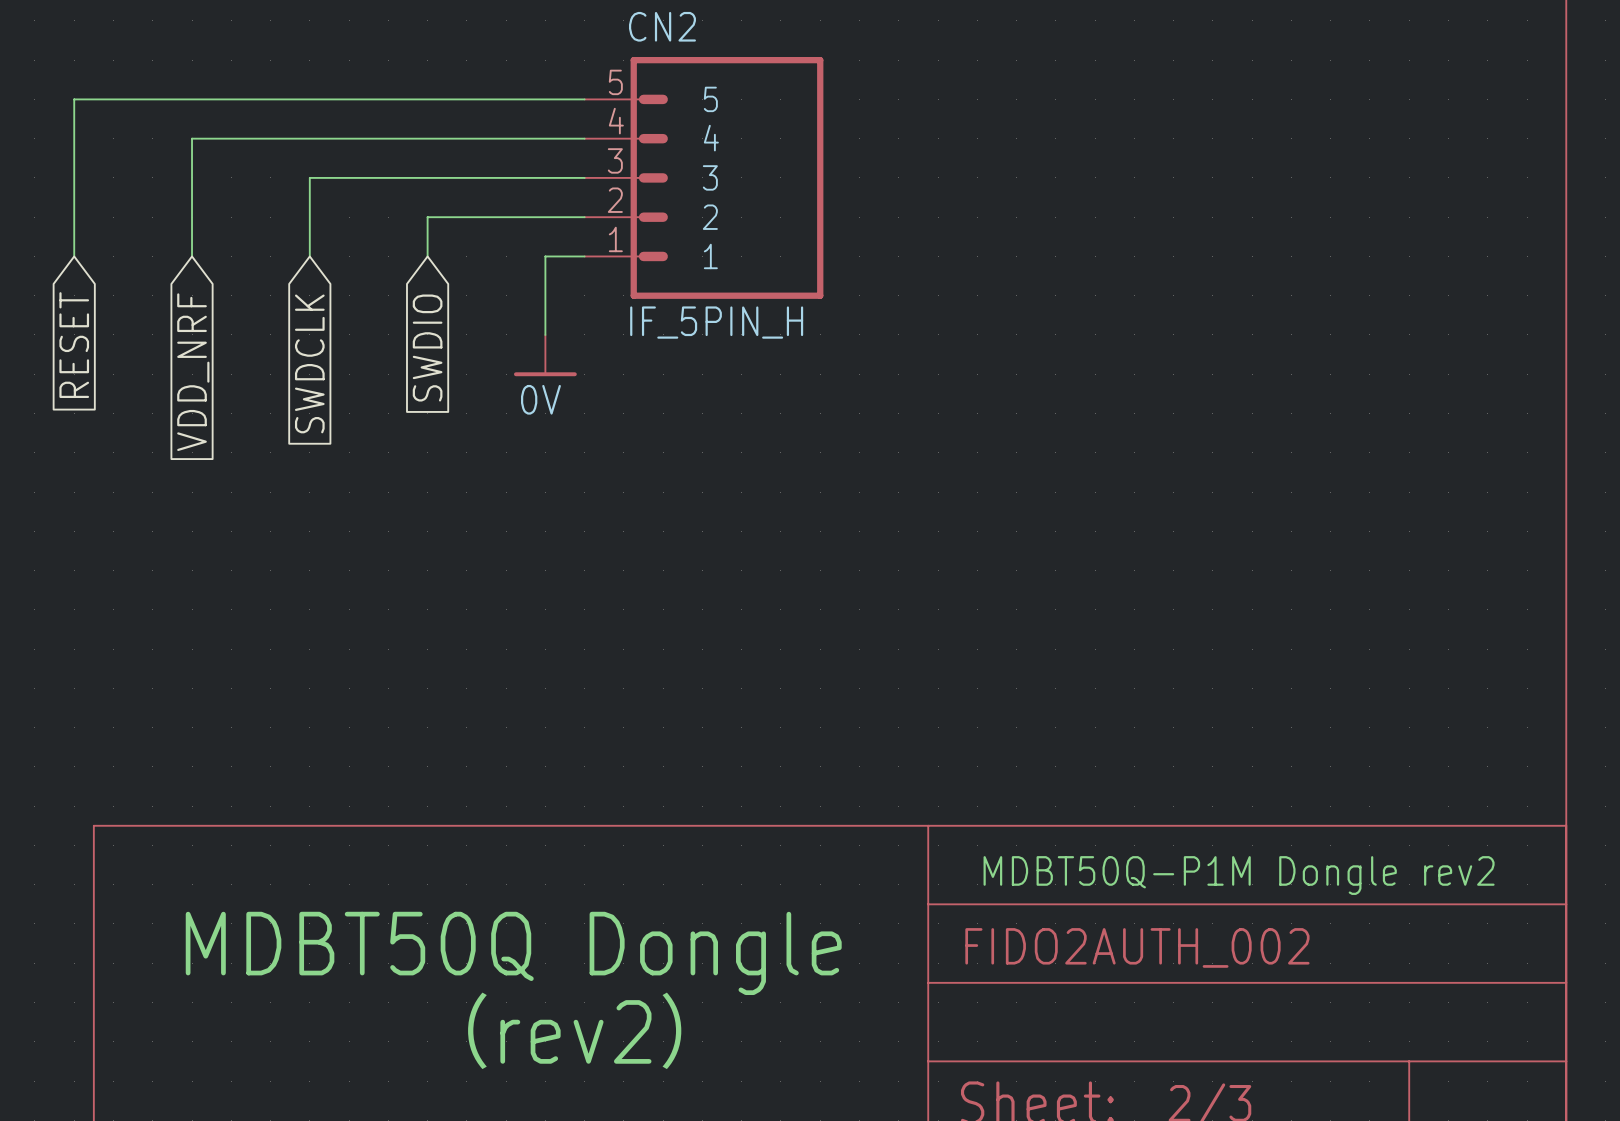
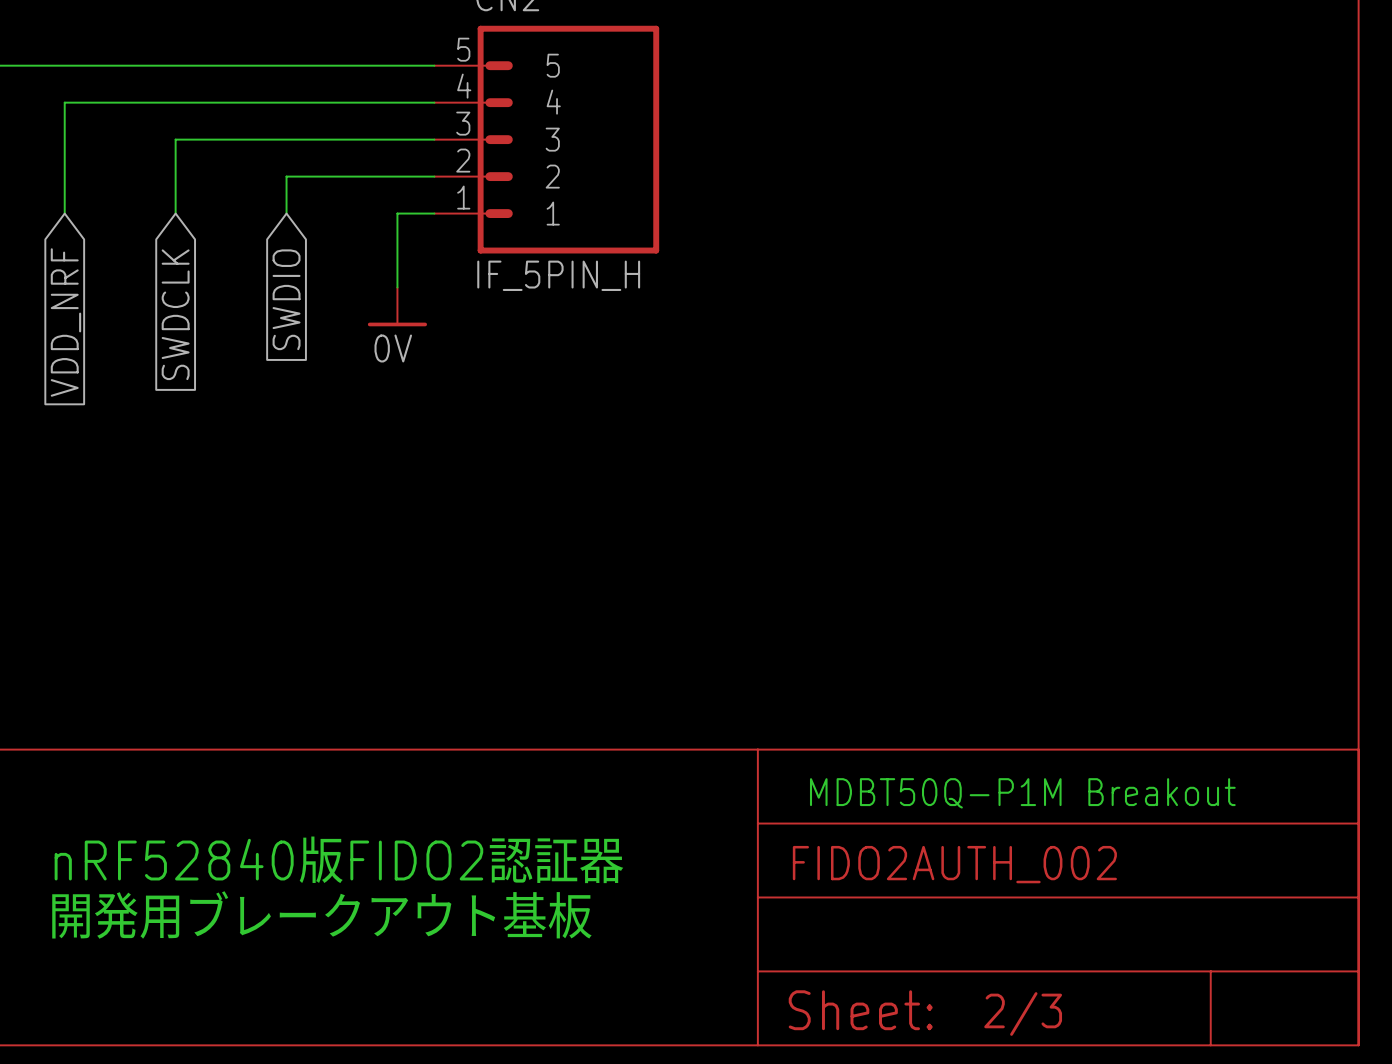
text: MDBT50Q-P1M Dongle rev2 (1239, 875) -> MDBT50Q-P1M Breakout (1022, 793)
text: MDBT50Q Dongle (513, 953) -> nRF52840版FIDO2認証器 (339, 859)
text: none -> 開発用ブレークアウト基板 (321, 914)
text: （rev2） (574, 1030) -> none

